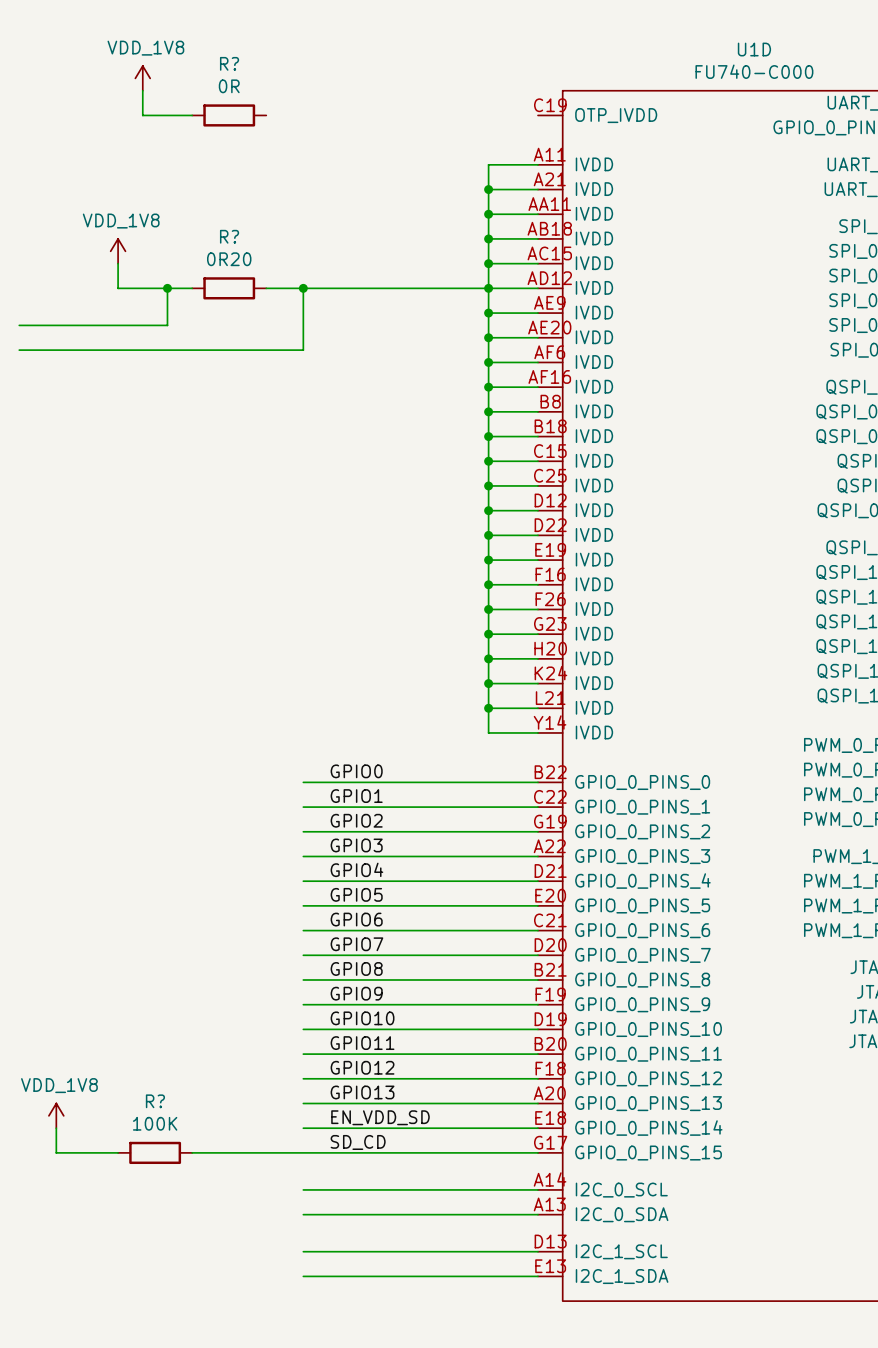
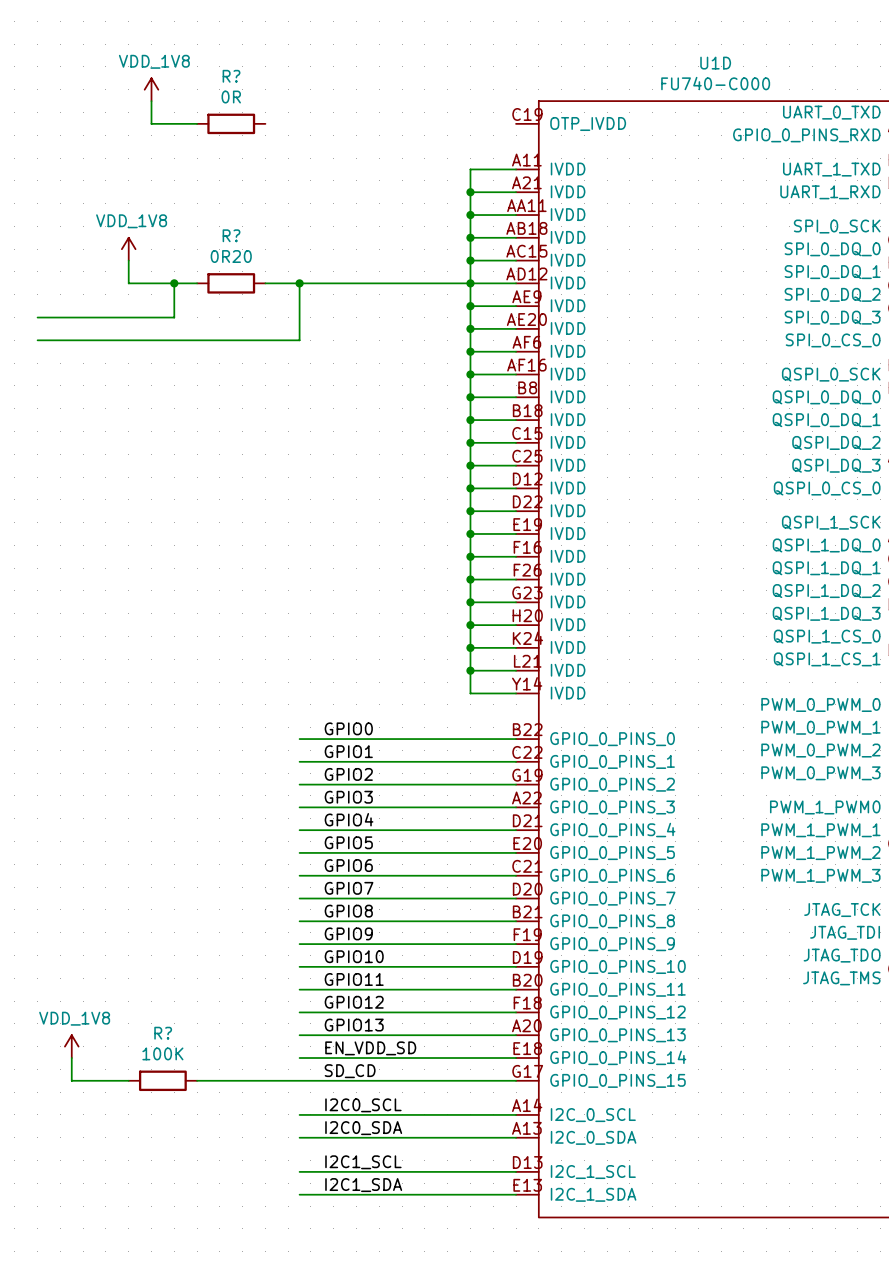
label: none -> I2C0_SCL (363, 1105)
label: none -> I2C0_SDA (363, 1128)
label: none -> I2C1_SCL (363, 1162)
label: none -> I2C1_SDA (363, 1185)

